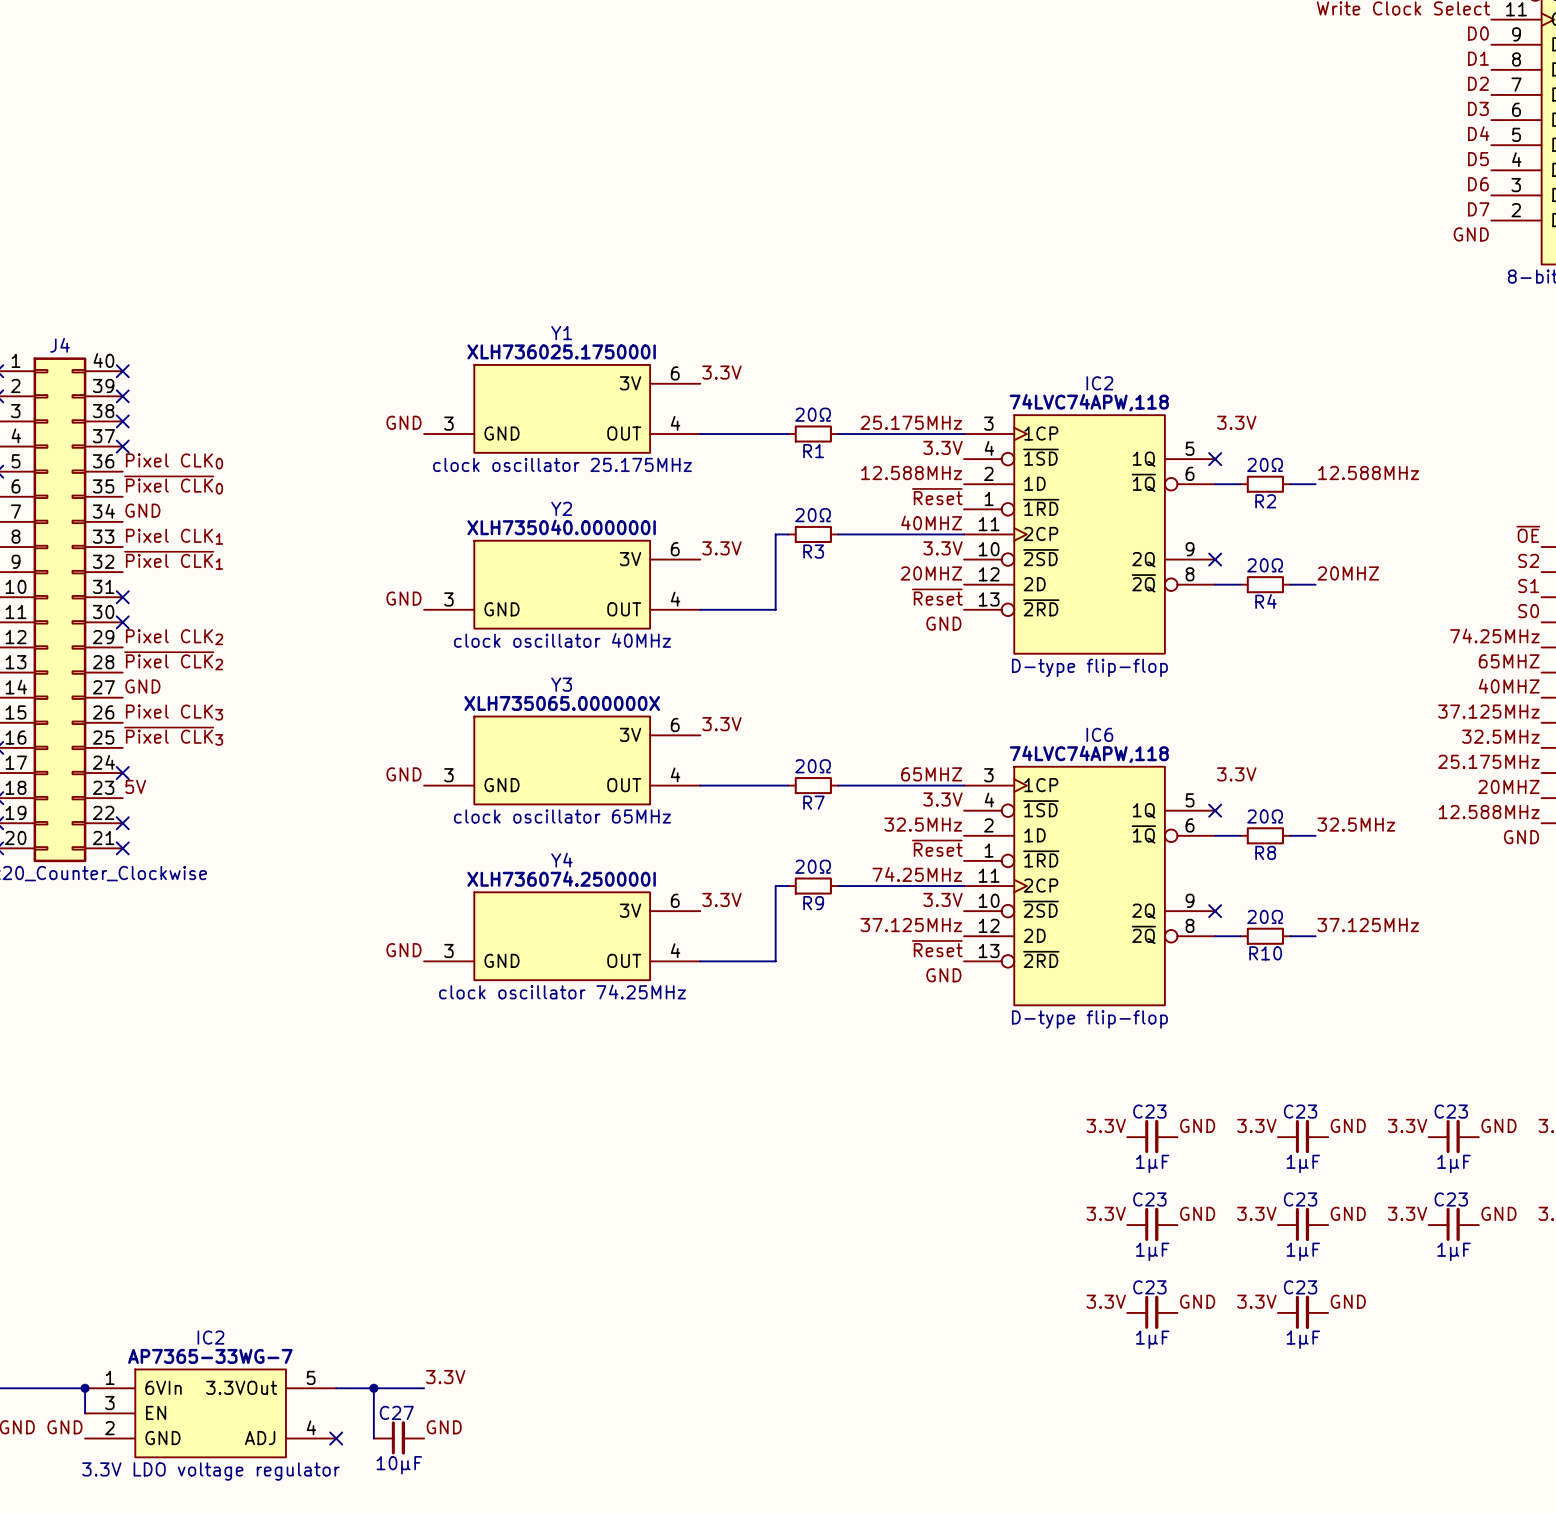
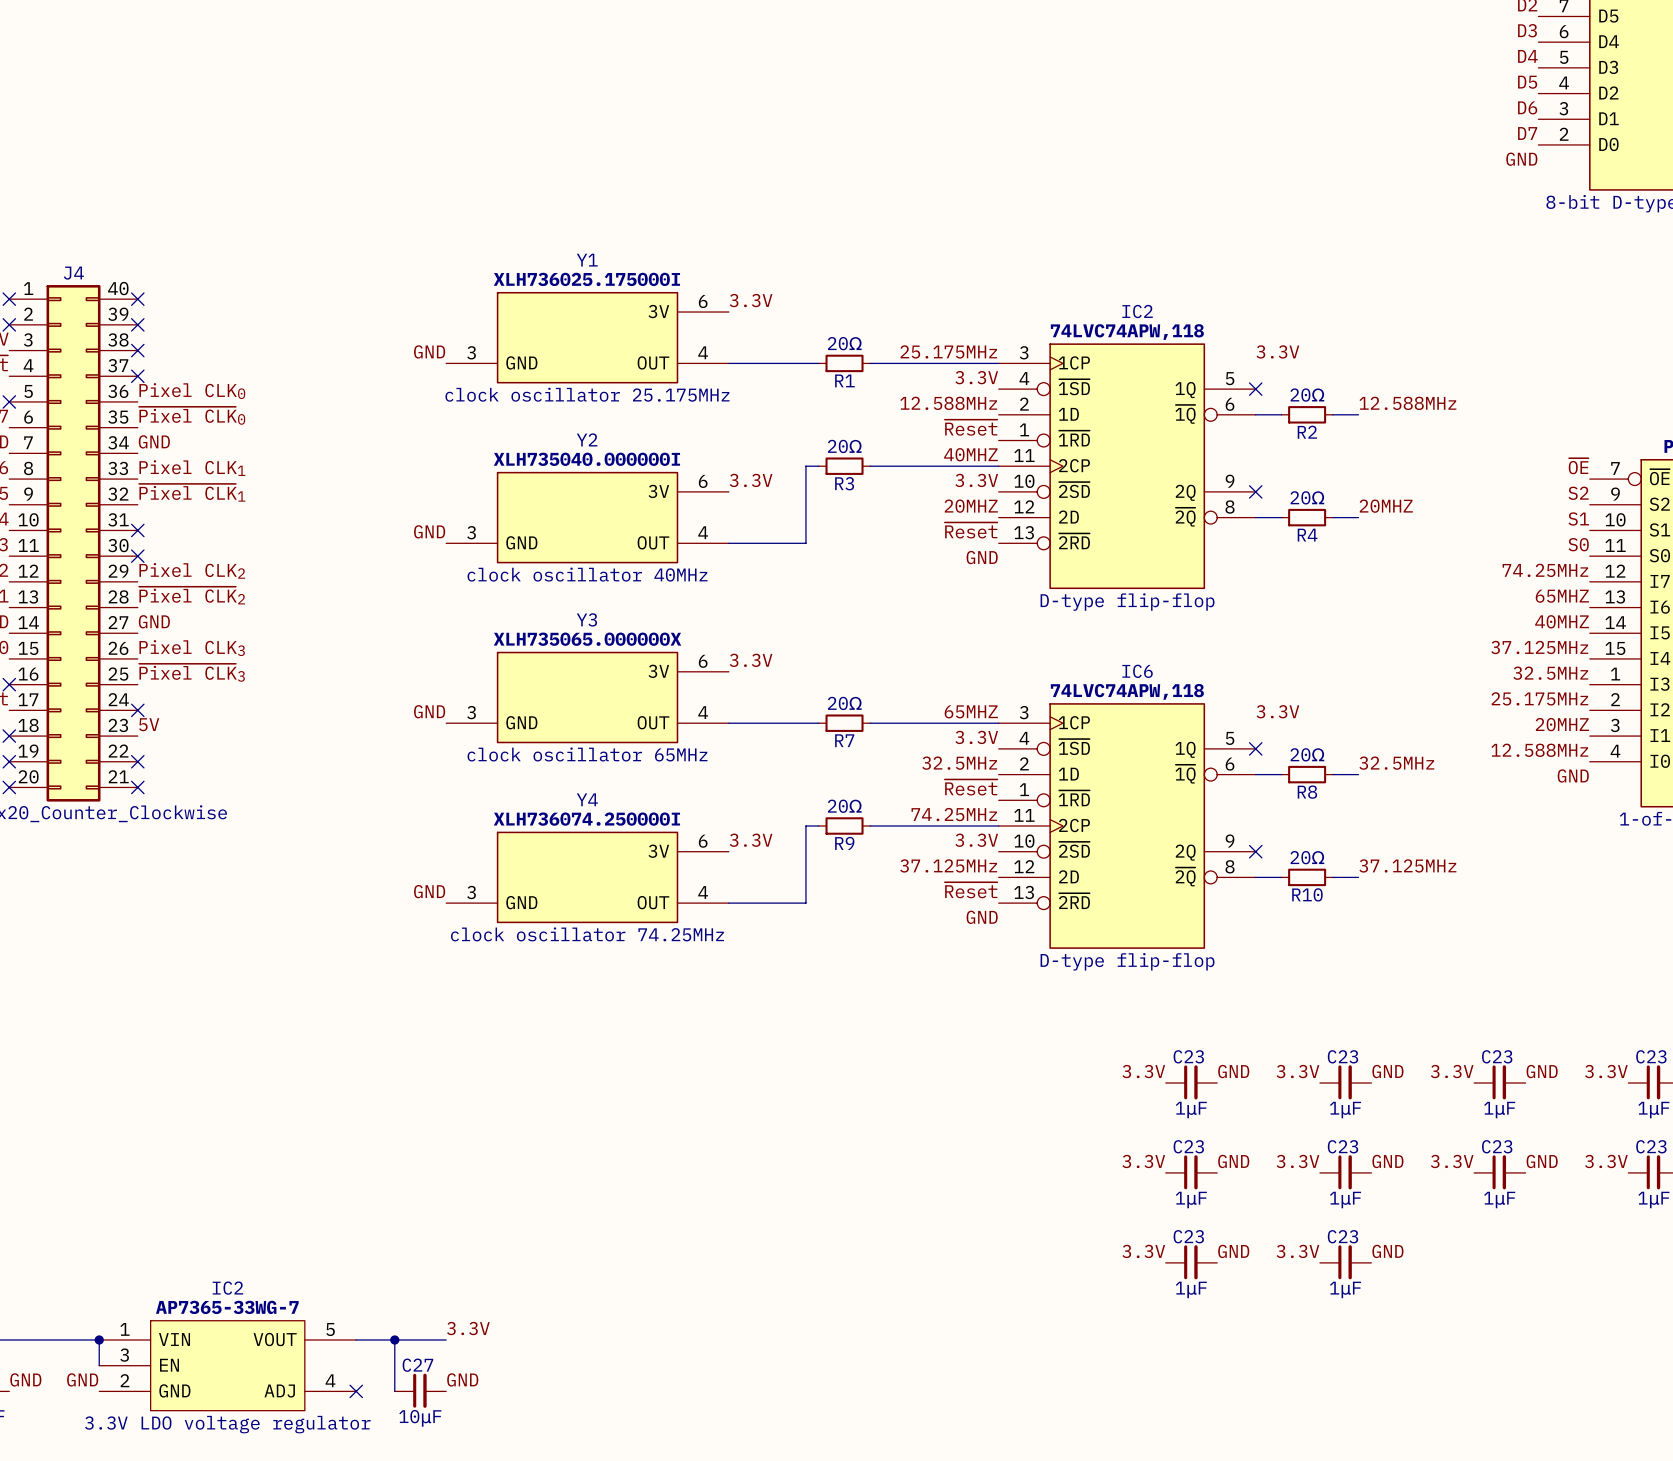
IC2 pin name: 6VIn (163, 1387) -> VIN (174, 1339)
IC2 pin name: 3.3VOut (241, 1387) -> VOUT (275, 1339)

